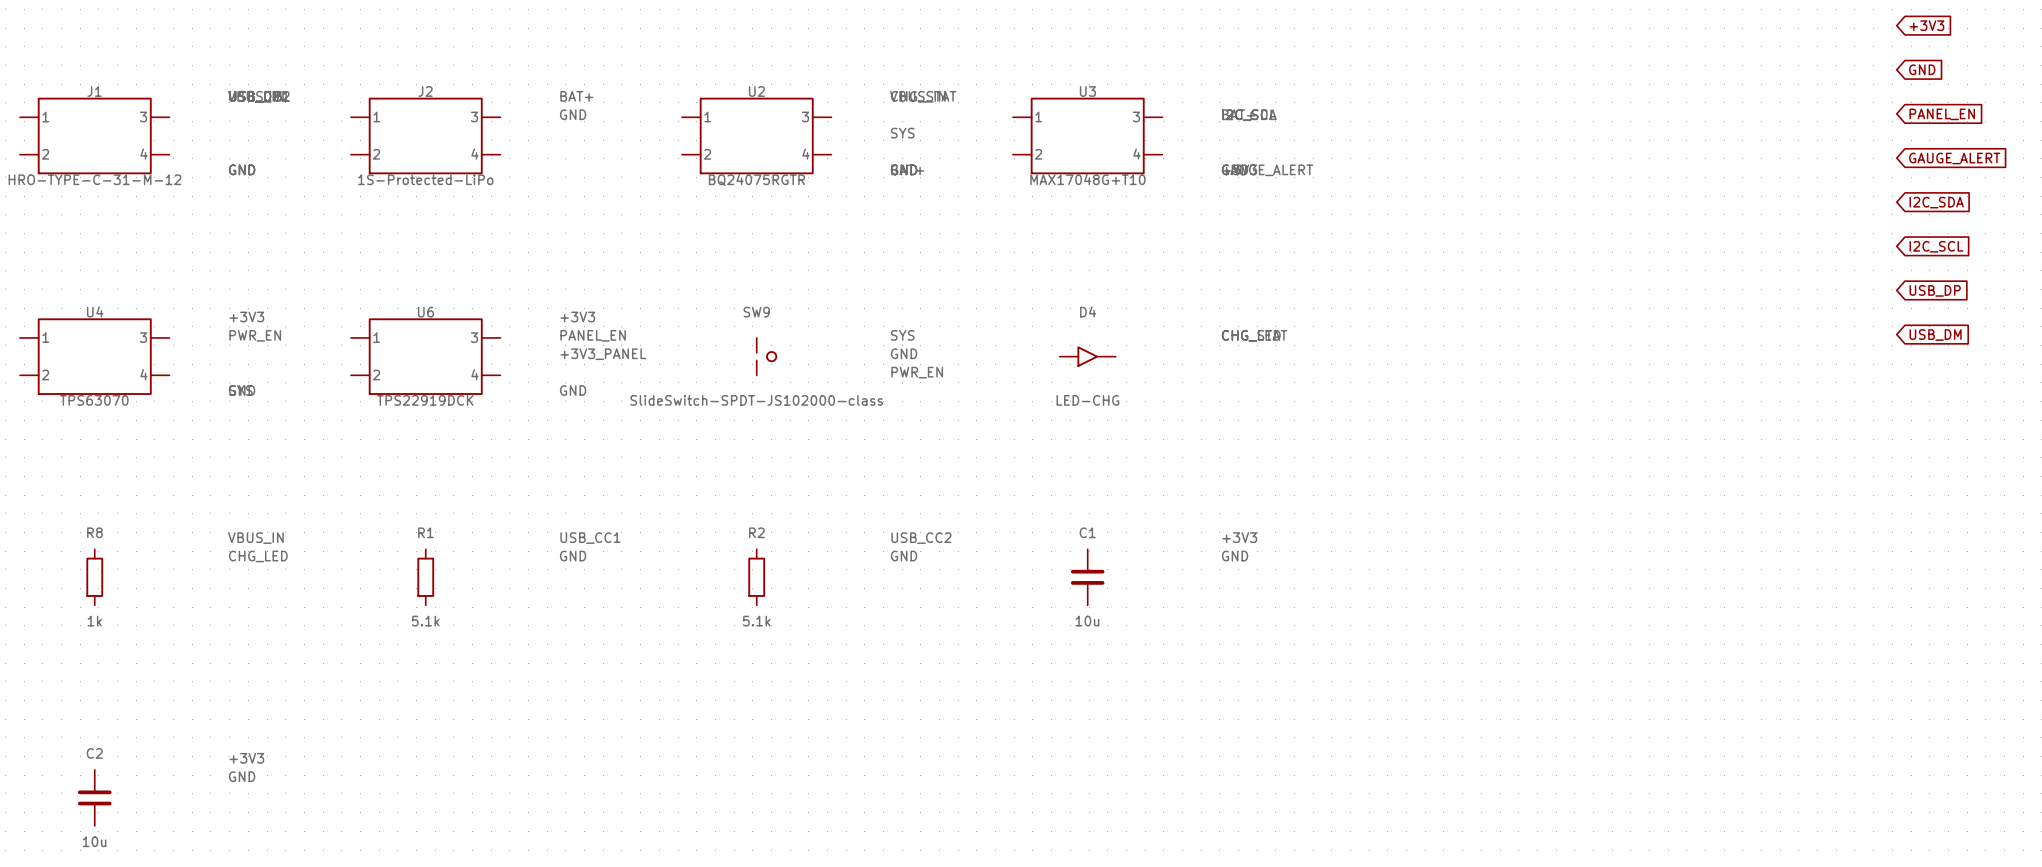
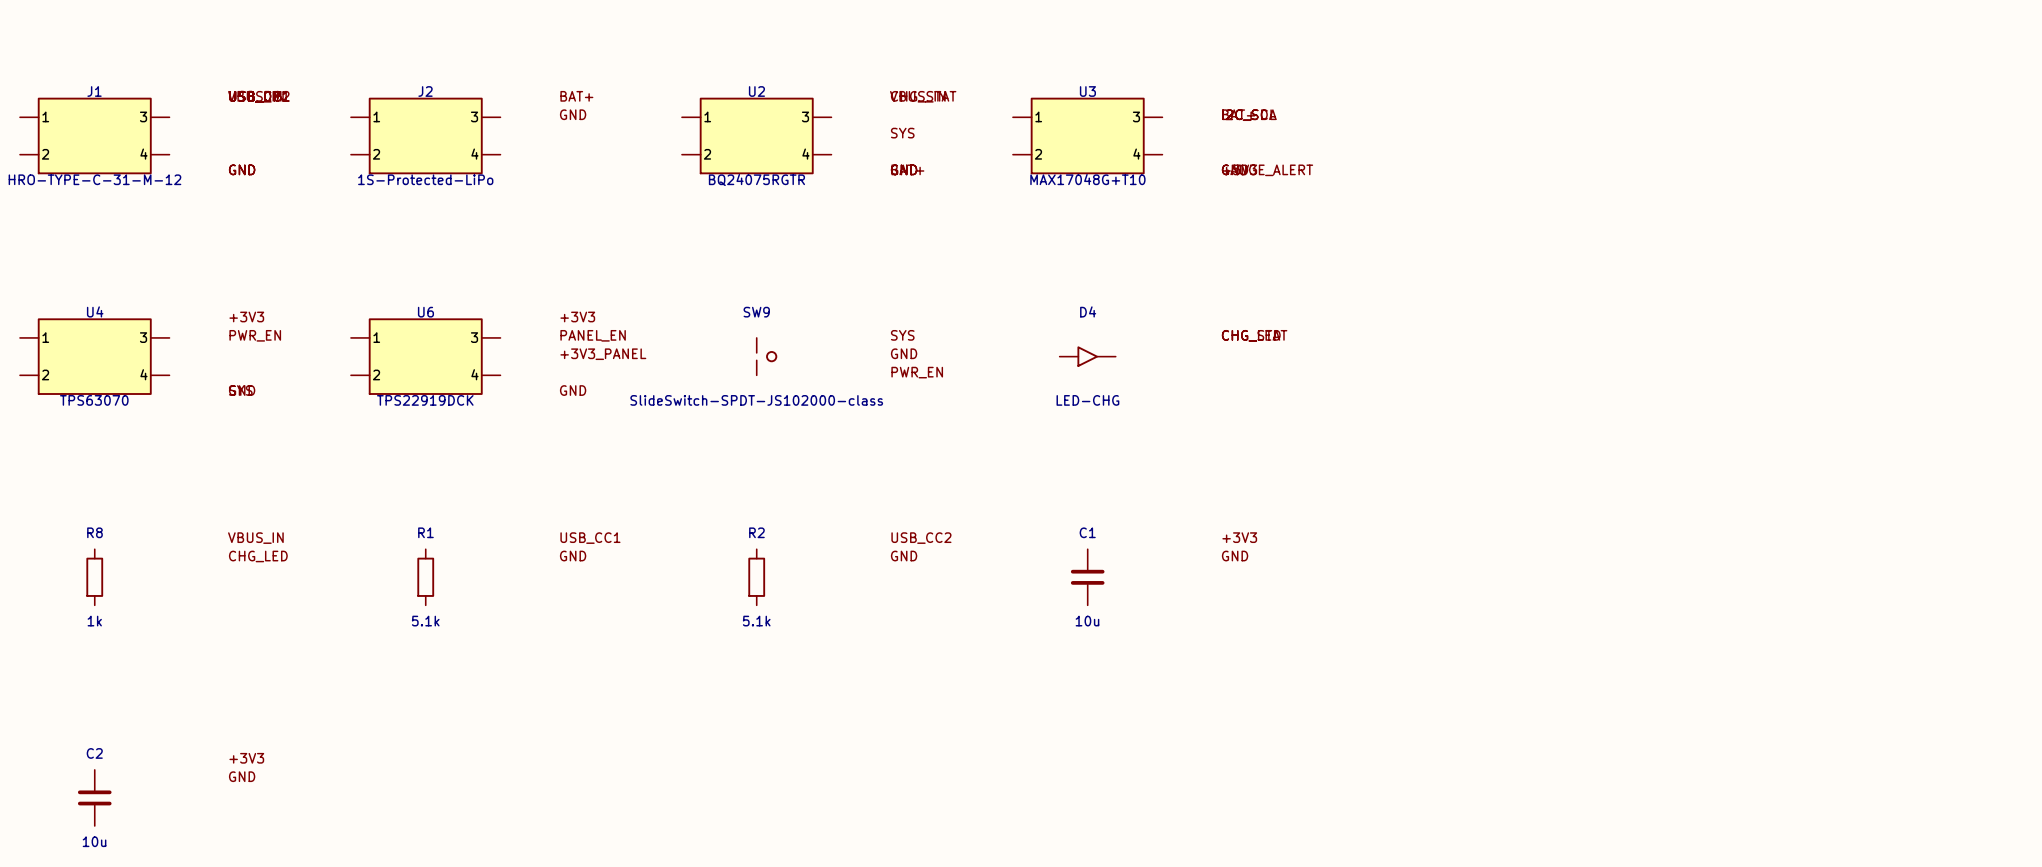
global label: +3V3 (1926, 25) -> none
global label: GND (1922, 69) -> none
global label: PANEL_EN (1942, 114) -> none
global label: GAUGE_ALERT (1954, 158) -> none
global label: I2C_SDA (1936, 202) -> none
global label: I2C_SCL (1936, 246) -> none
global label: USB_DP (1935, 290) -> none
global label: USB_DM (1935, 335) -> none

